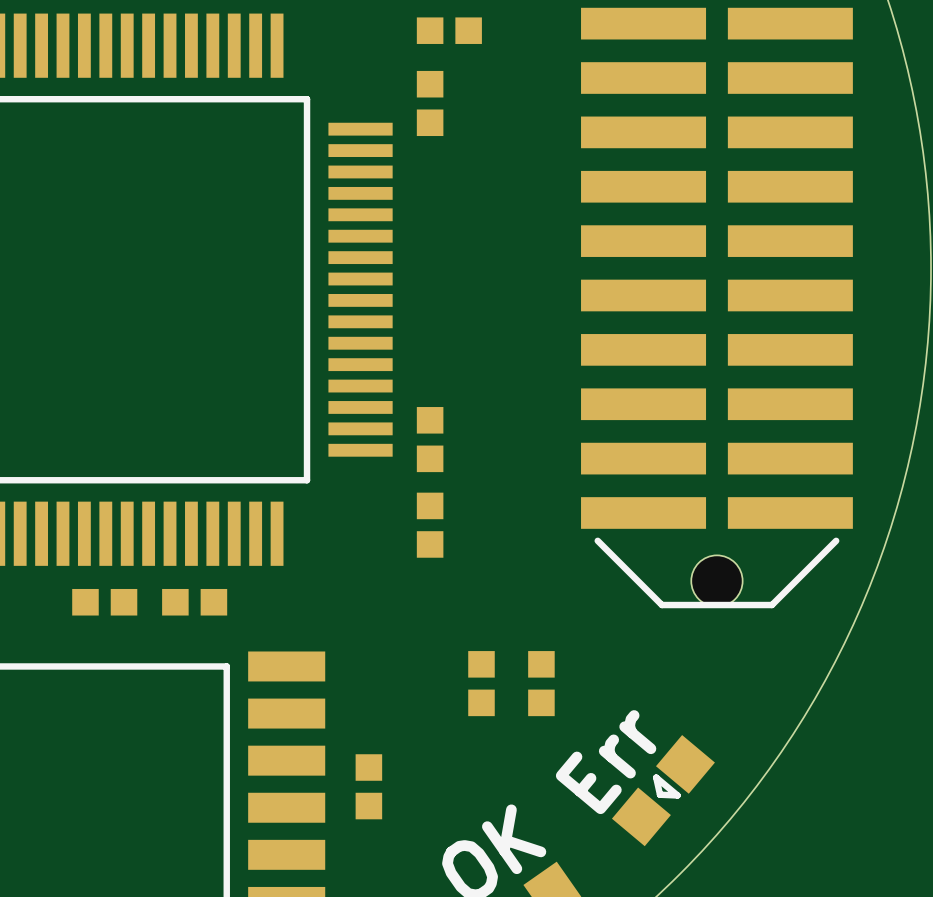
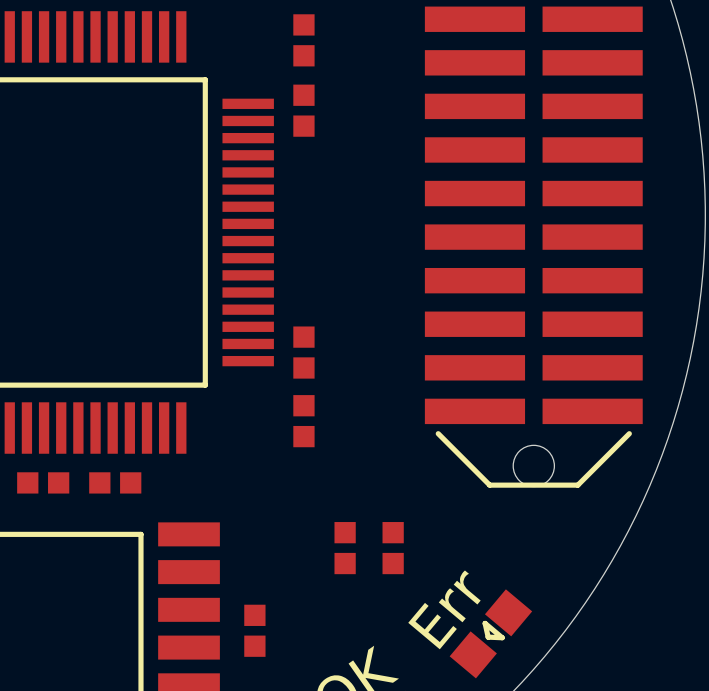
part: (449, 30) -> none
part: none -> (303, 40)
part: (430, 103) -> none
part: none -> (303, 110)

